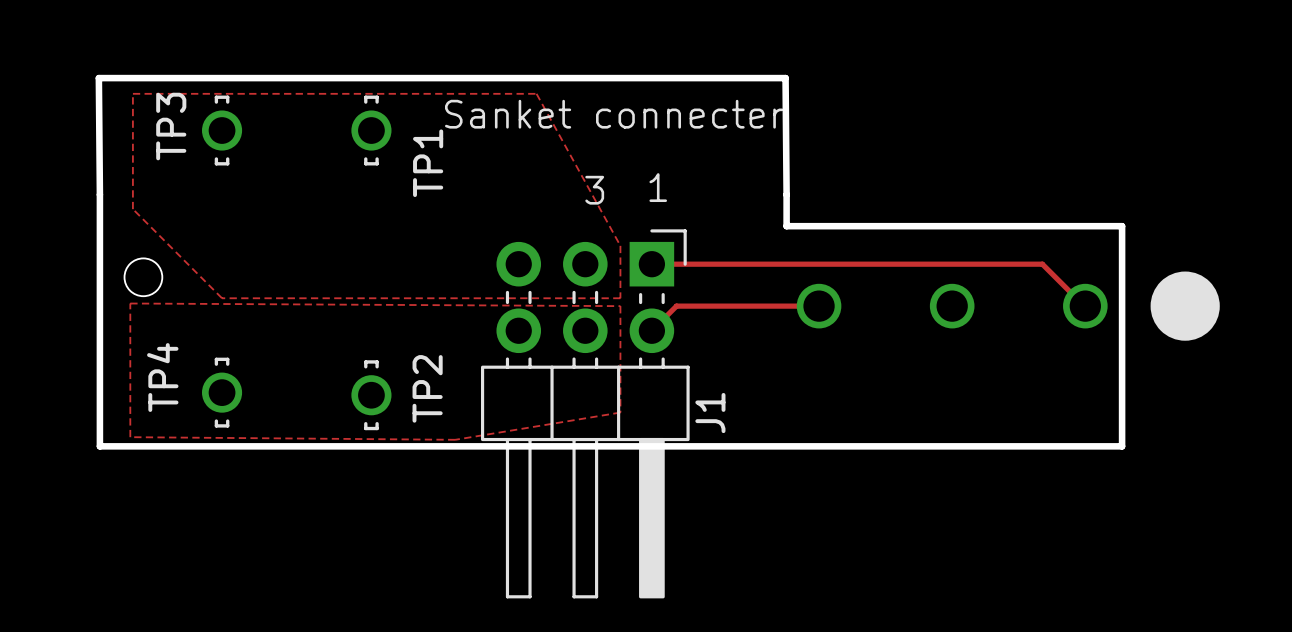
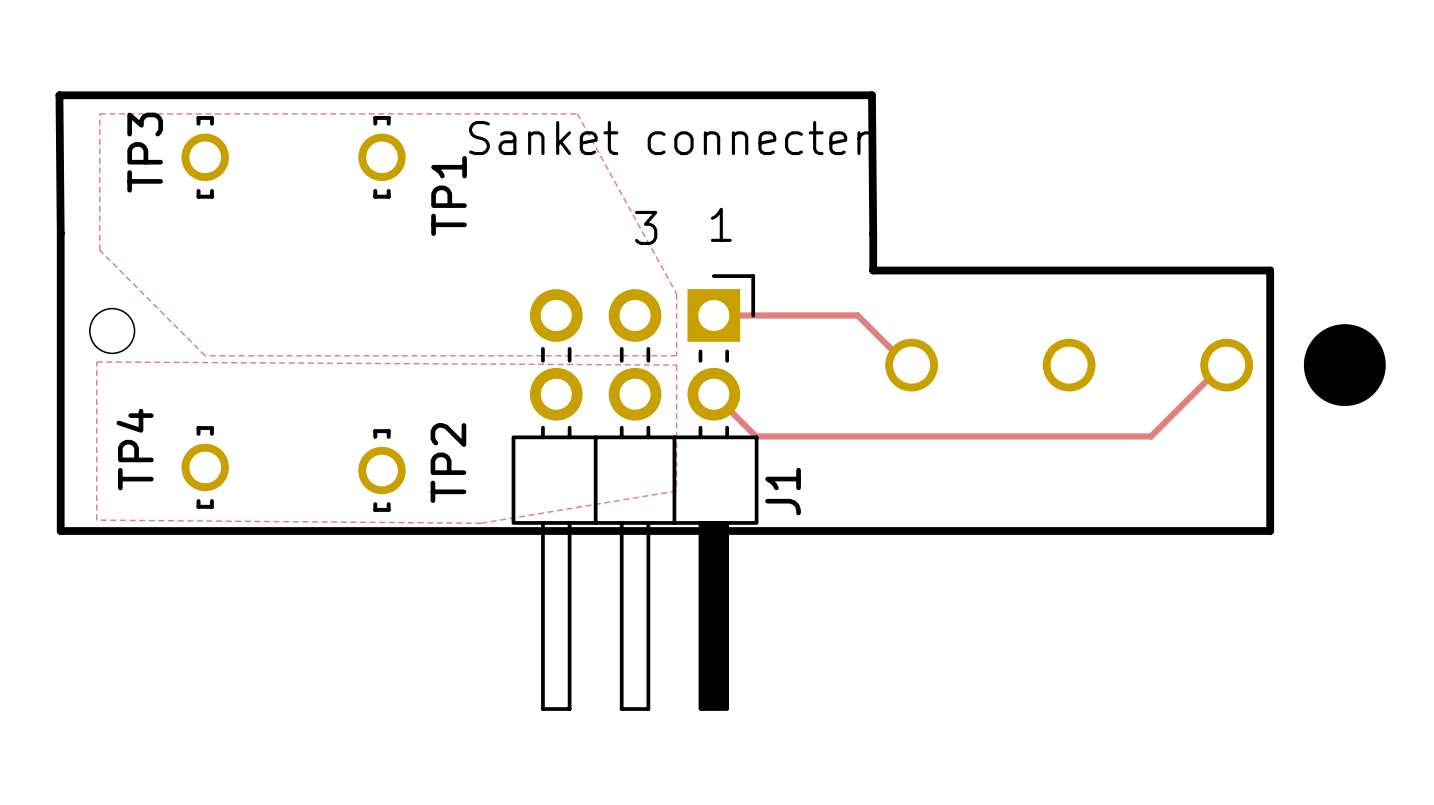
track: (773, 264) (1042, 264) (1084, 306) -> (857, 315) (907, 365)
track: (818, 306) (676, 306) (651, 330) -> (1222, 365) (1151, 436) (755, 436) (713, 394)

